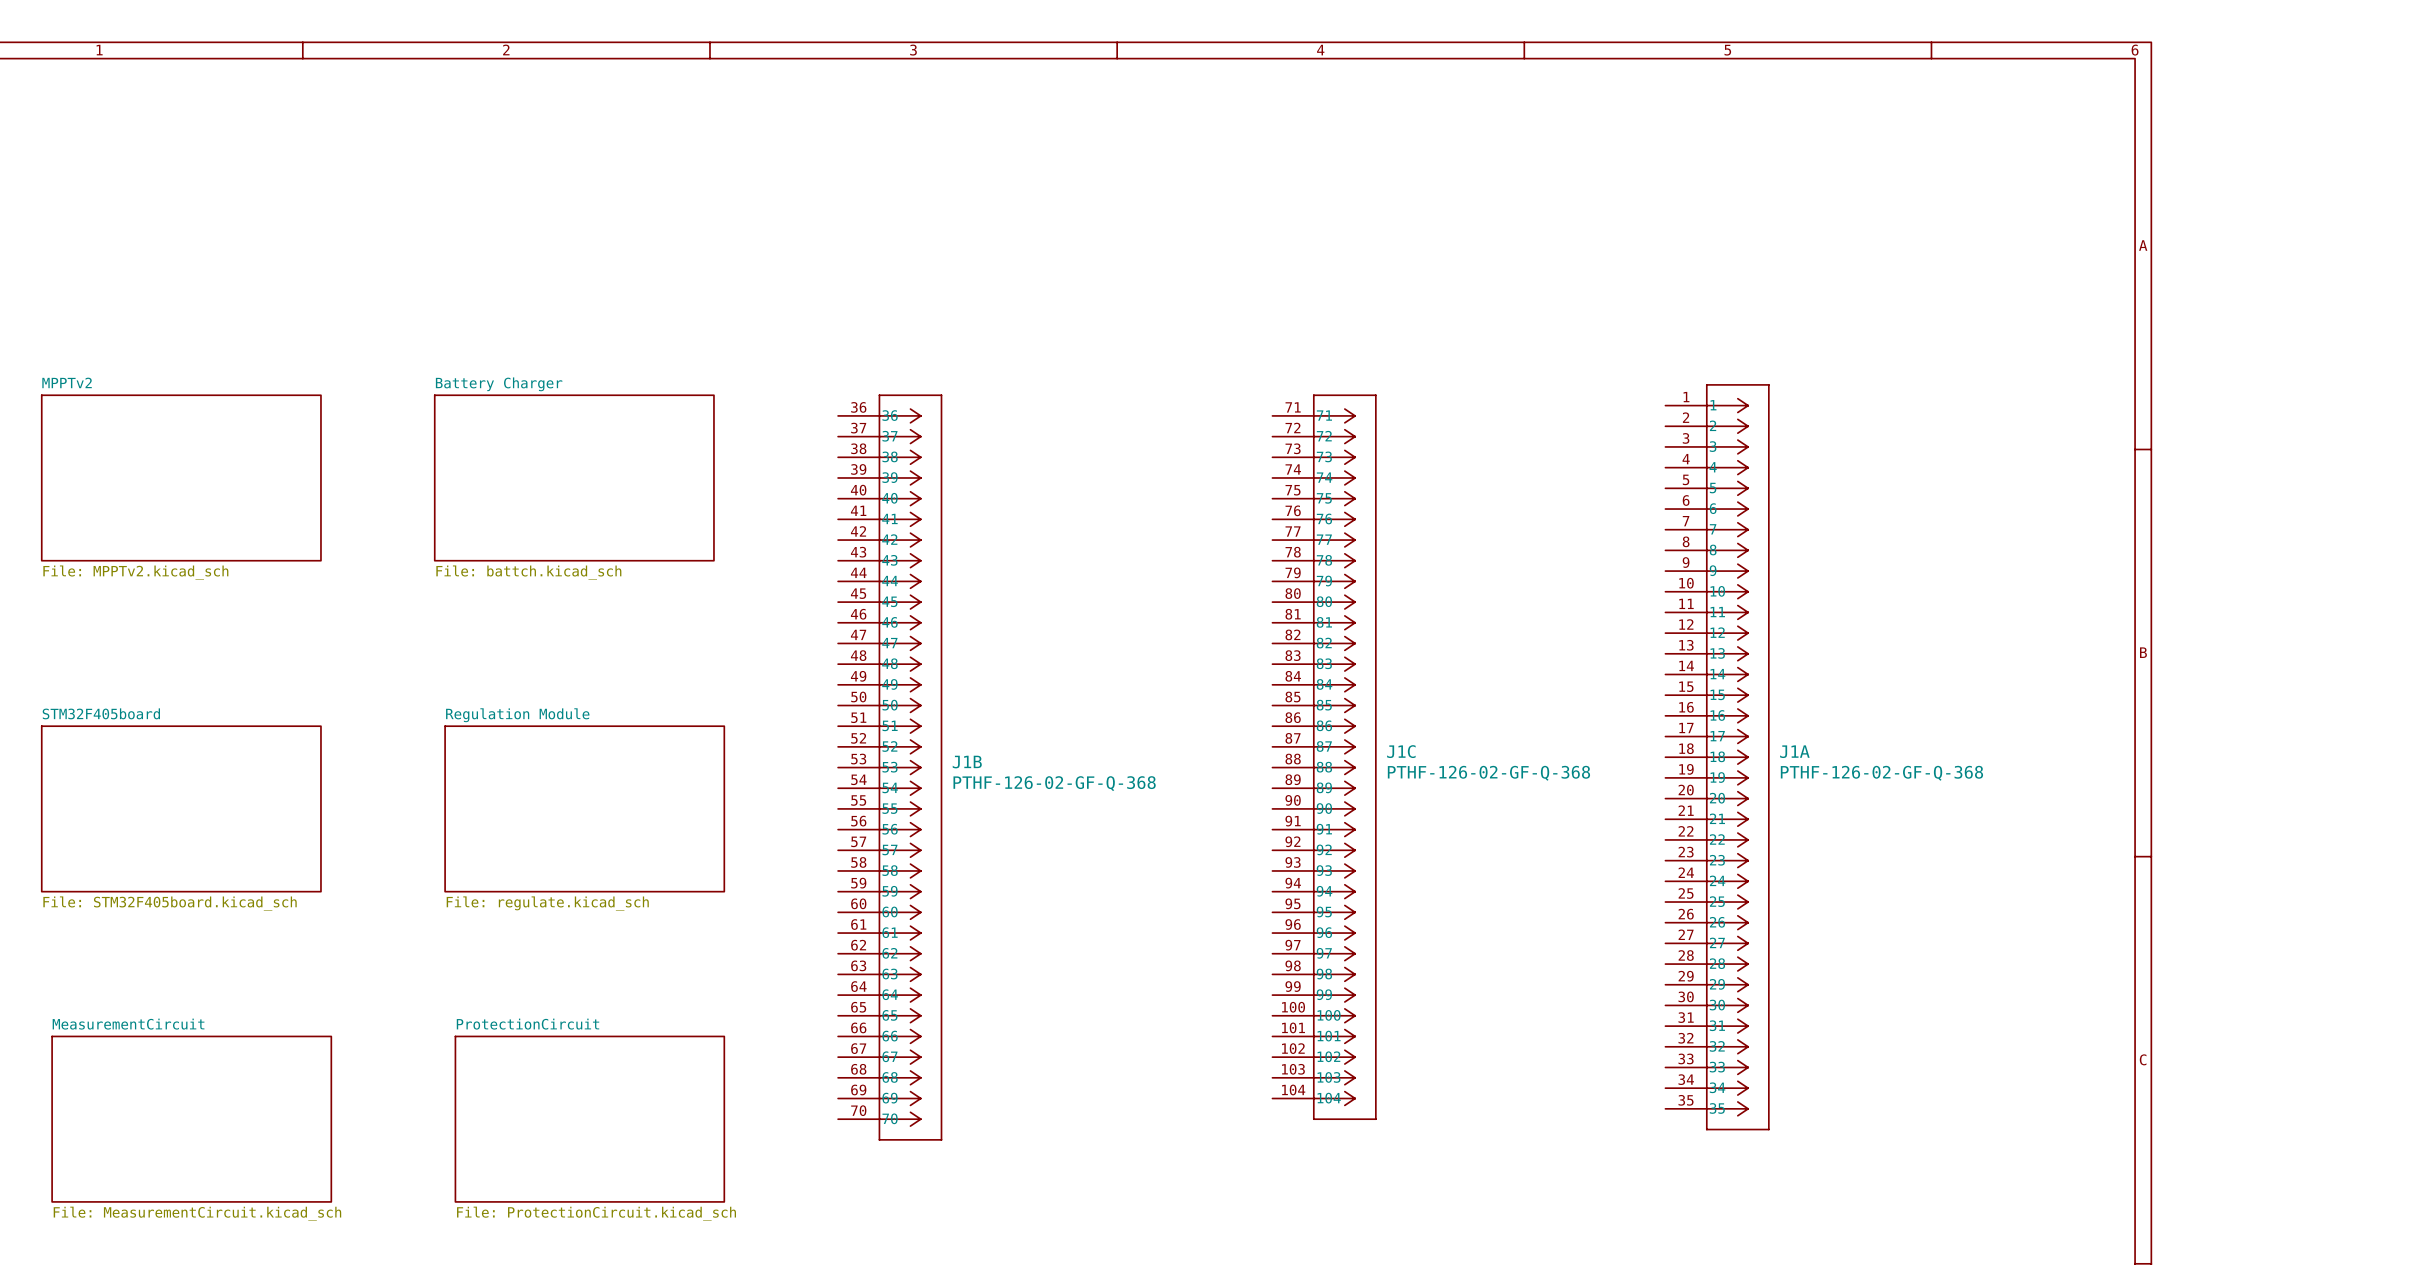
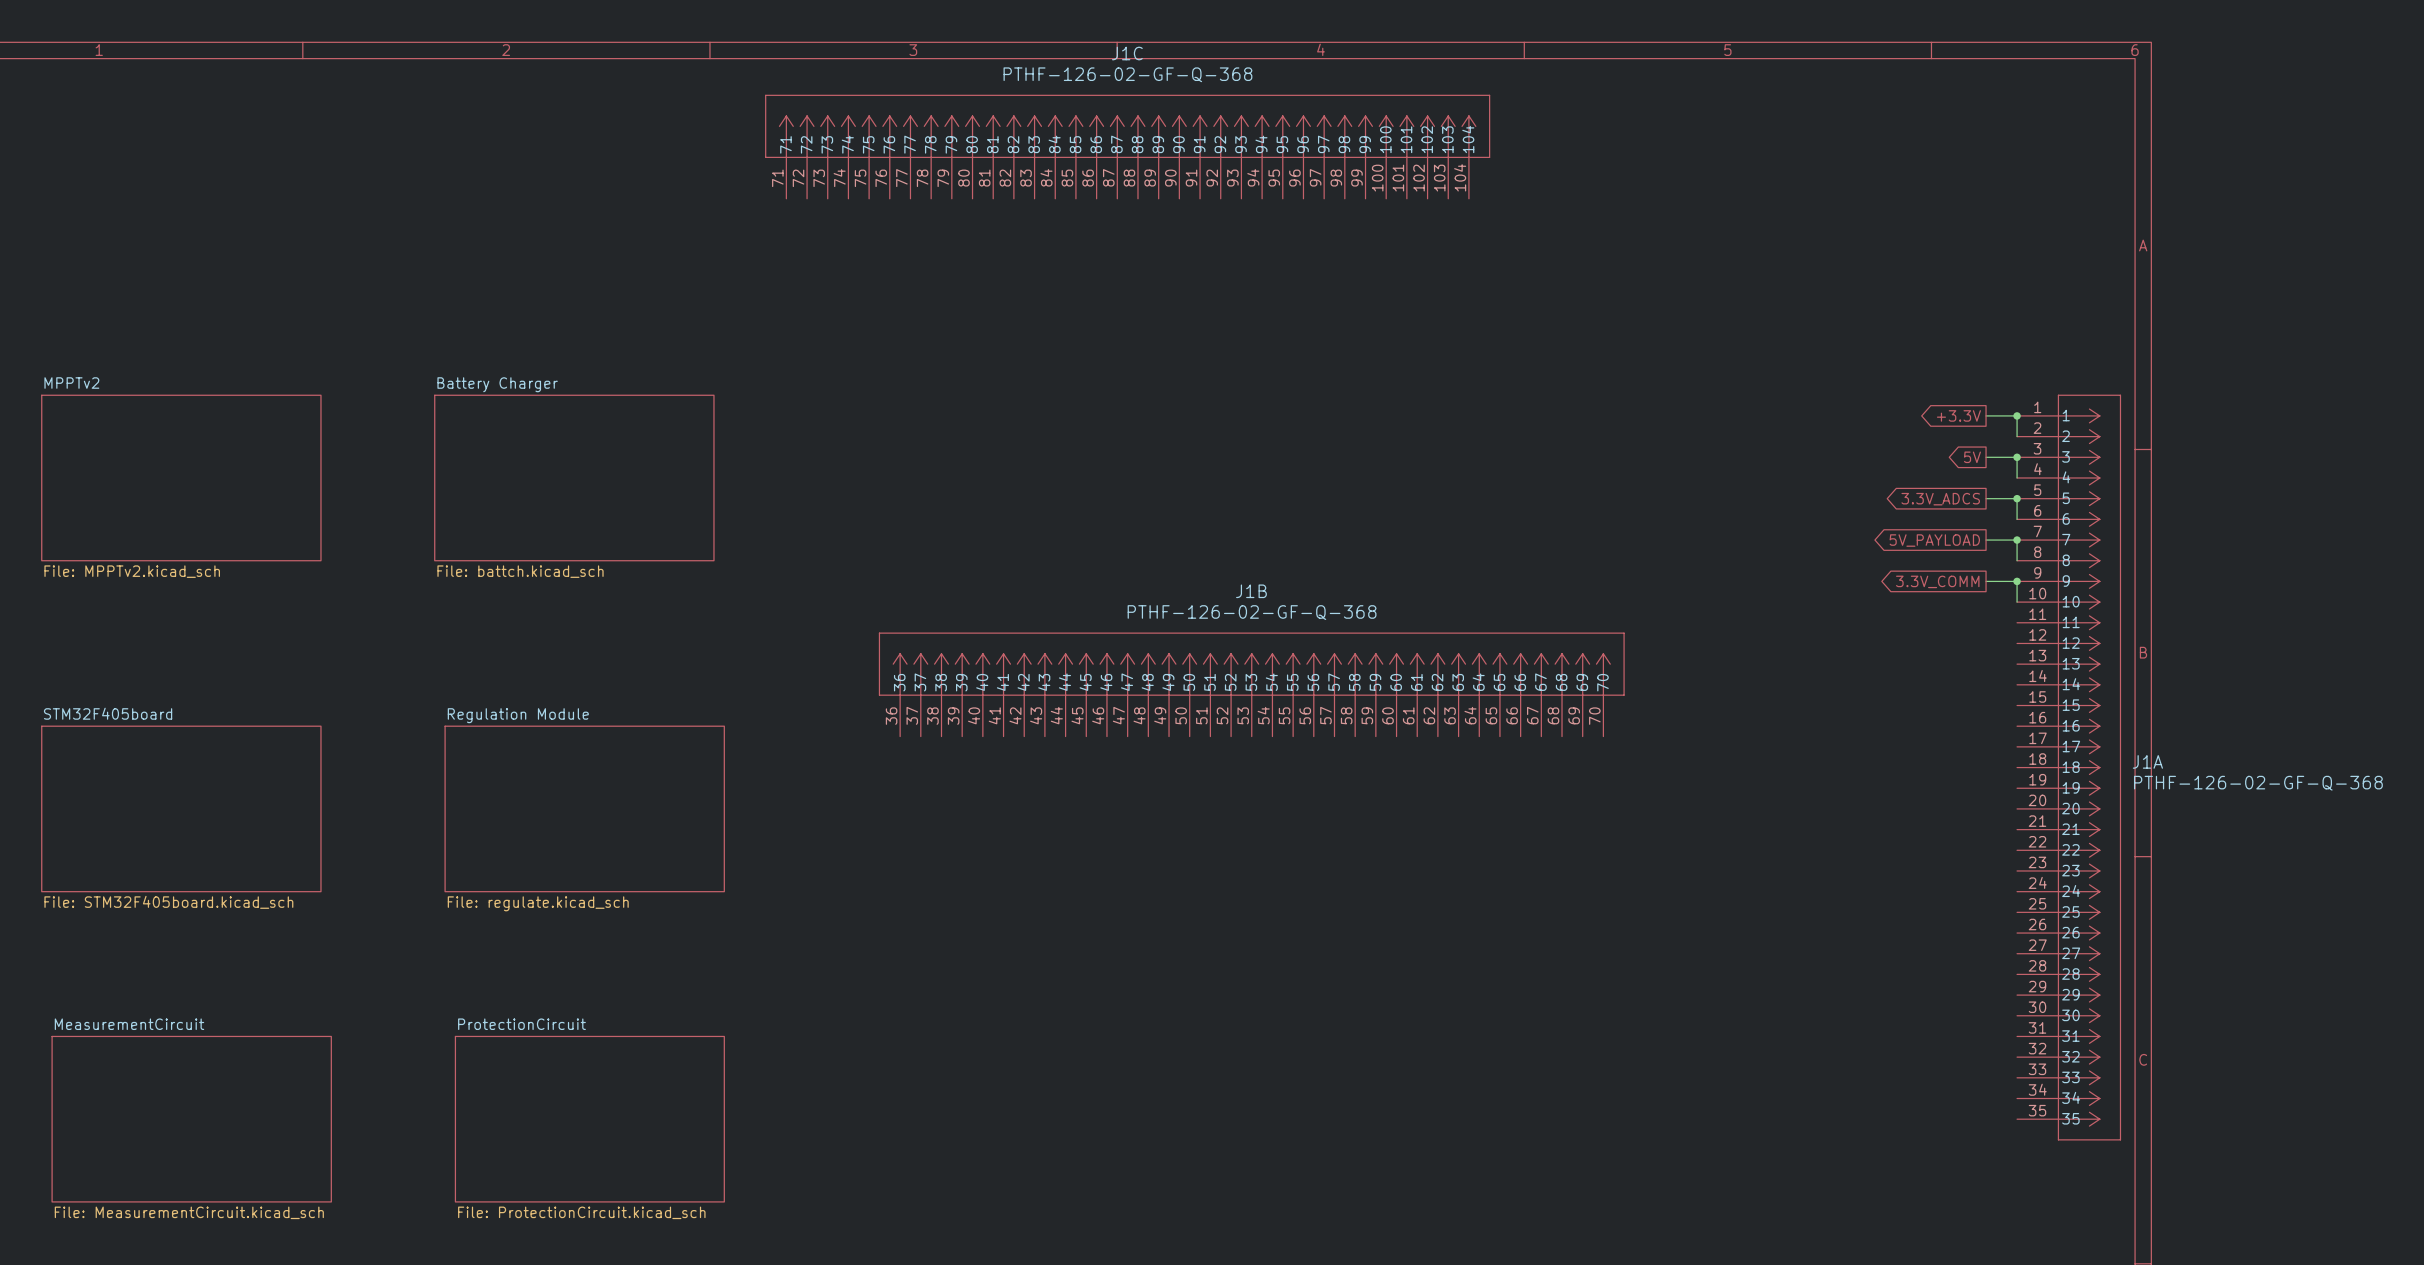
global label: none -> +3.3V (1958, 415)
wire: none -> (1986, 415) (2017, 415) (2017, 436)
junction: none -> (2017, 415)
global label: none -> 5V (1972, 457)
wire: none -> (1986, 457) (2017, 457) (2017, 477)
junction: none -> (2017, 457)
wire: none -> (1986, 498) (2017, 498) (2017, 519)
junction: none -> (2017, 498)
global label: none -> 3.3V_ADCS (1940, 499)
wire: none -> (1986, 540) (2017, 540) (2017, 560)
junction: none -> (2017, 540)
global label: none -> 5V_PAYLOAD (1934, 540)
wire: none -> (1986, 581) (2017, 581) (2017, 602)
junction: none -> (2017, 581)
global label: none -> 3.3V_COMM (1937, 581)
J1C position: (1324, 757) -> (1127, 146)
J1C rotation: 0° (1344, 757) -> 90° counterclockwise (1127, 126)
J1A position: (1717, 757) -> (2069, 767)
J1B rotation: 0° (910, 767) -> 90° counterclockwise (1251, 664)
J1C value position: PTHF-126-02-GF-Q-368 (1488, 773) -> PTHF-126-02-GF-Q-368 (1127, 74)
J1B value position: PTHF-126-02-GF-Q-368 (1054, 783) -> PTHF-126-02-GF-Q-368 (1252, 612)

